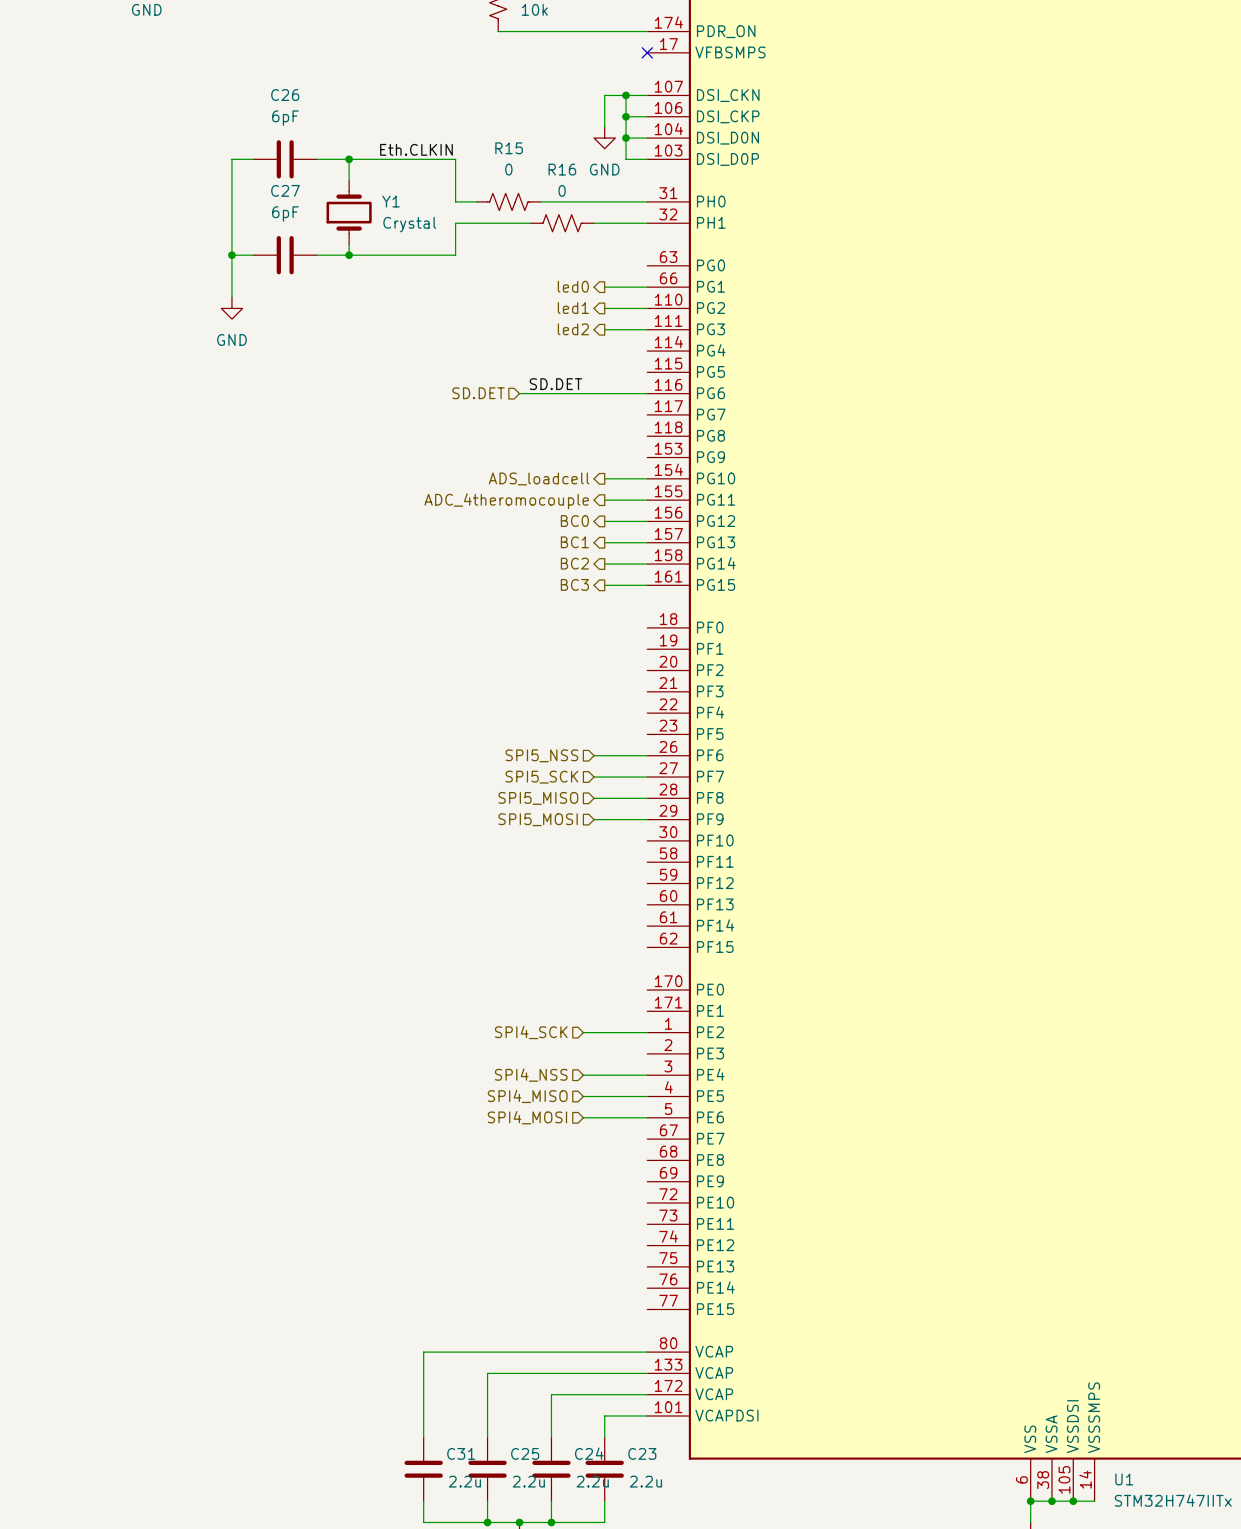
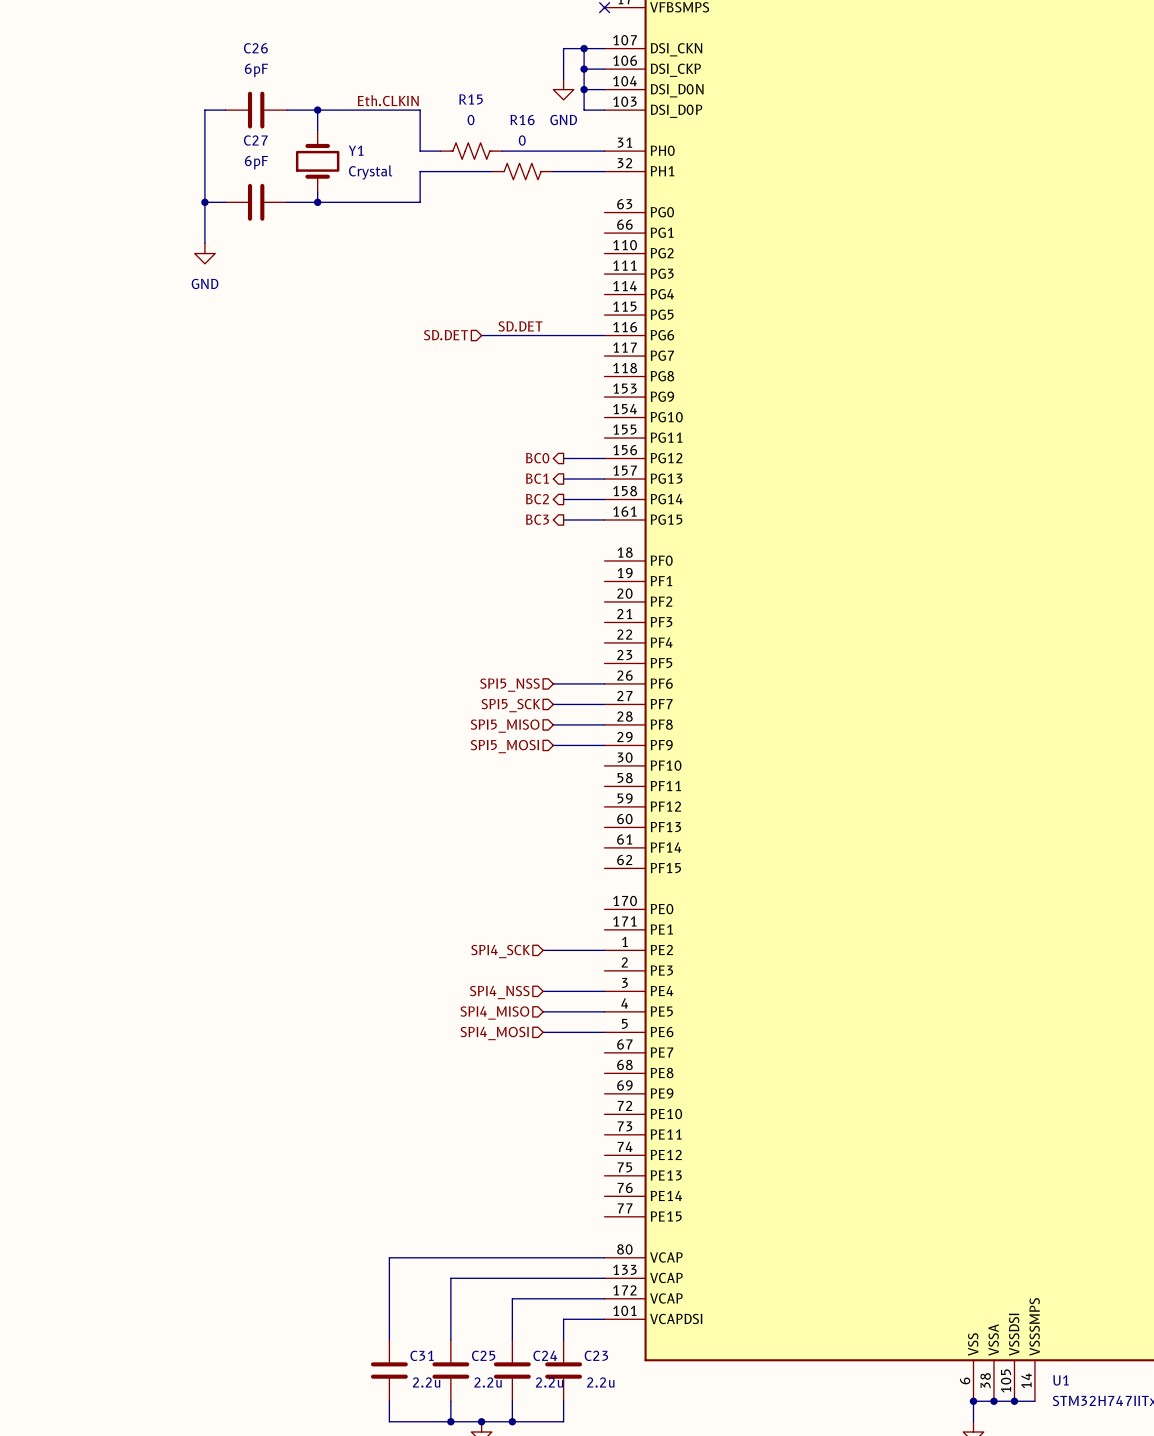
hierarchical label: led0 (573, 286) -> none
wire: (604, 287) (647, 287) -> none
hierarchical label: led1 (573, 308) -> none
wire: (604, 308) (647, 308) -> none
hierarchical label: led2 (573, 329) -> none
wire: (604, 329) (647, 329) -> none
hierarchical label: ADS_loadcell (539, 478) -> none
wire: (604, 478) (647, 478) -> none
wire: (604, 500) (647, 500) -> none
hierarchical label: ADC_4theromocouple (506, 501) -> none

